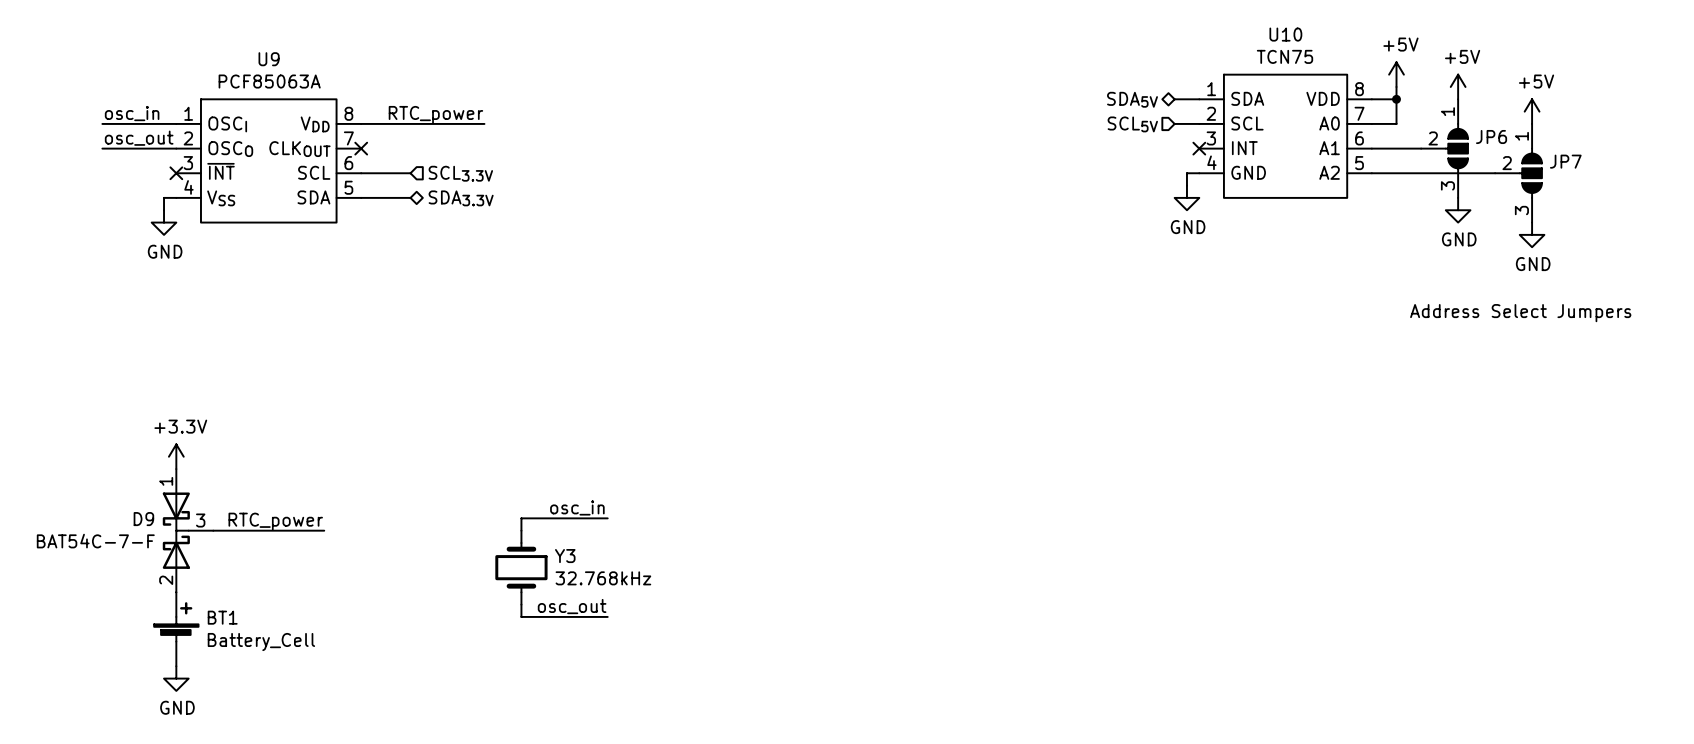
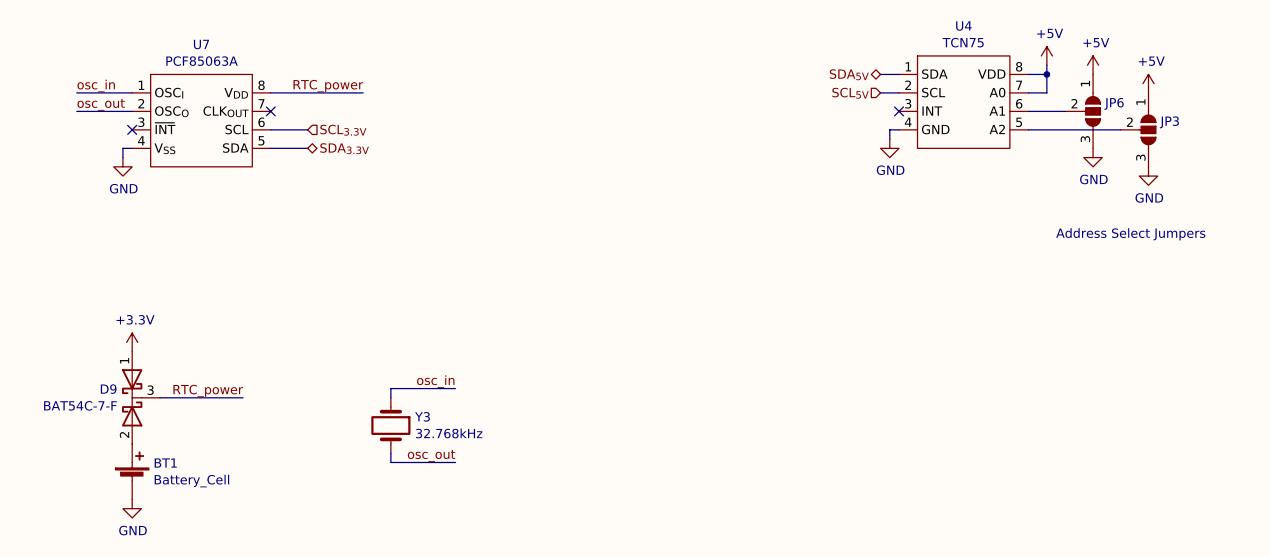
U10 name: U10 (1285, 34) -> U4 (963, 26)
U9 name: U9 (269, 59) -> U7 (201, 44)
JP7 name: JP7 (1565, 161) -> JP3 (1169, 122)

